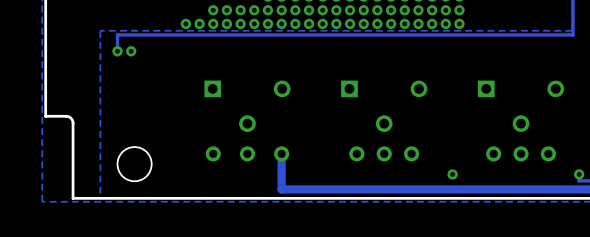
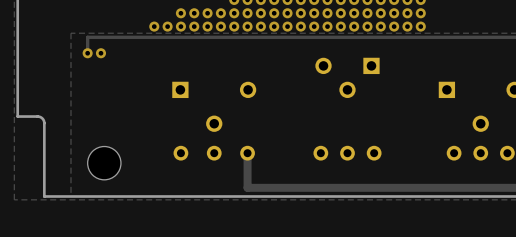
part: none -> (347, 77)
part: (384, 106) -> none
via: (452, 174) -> none

